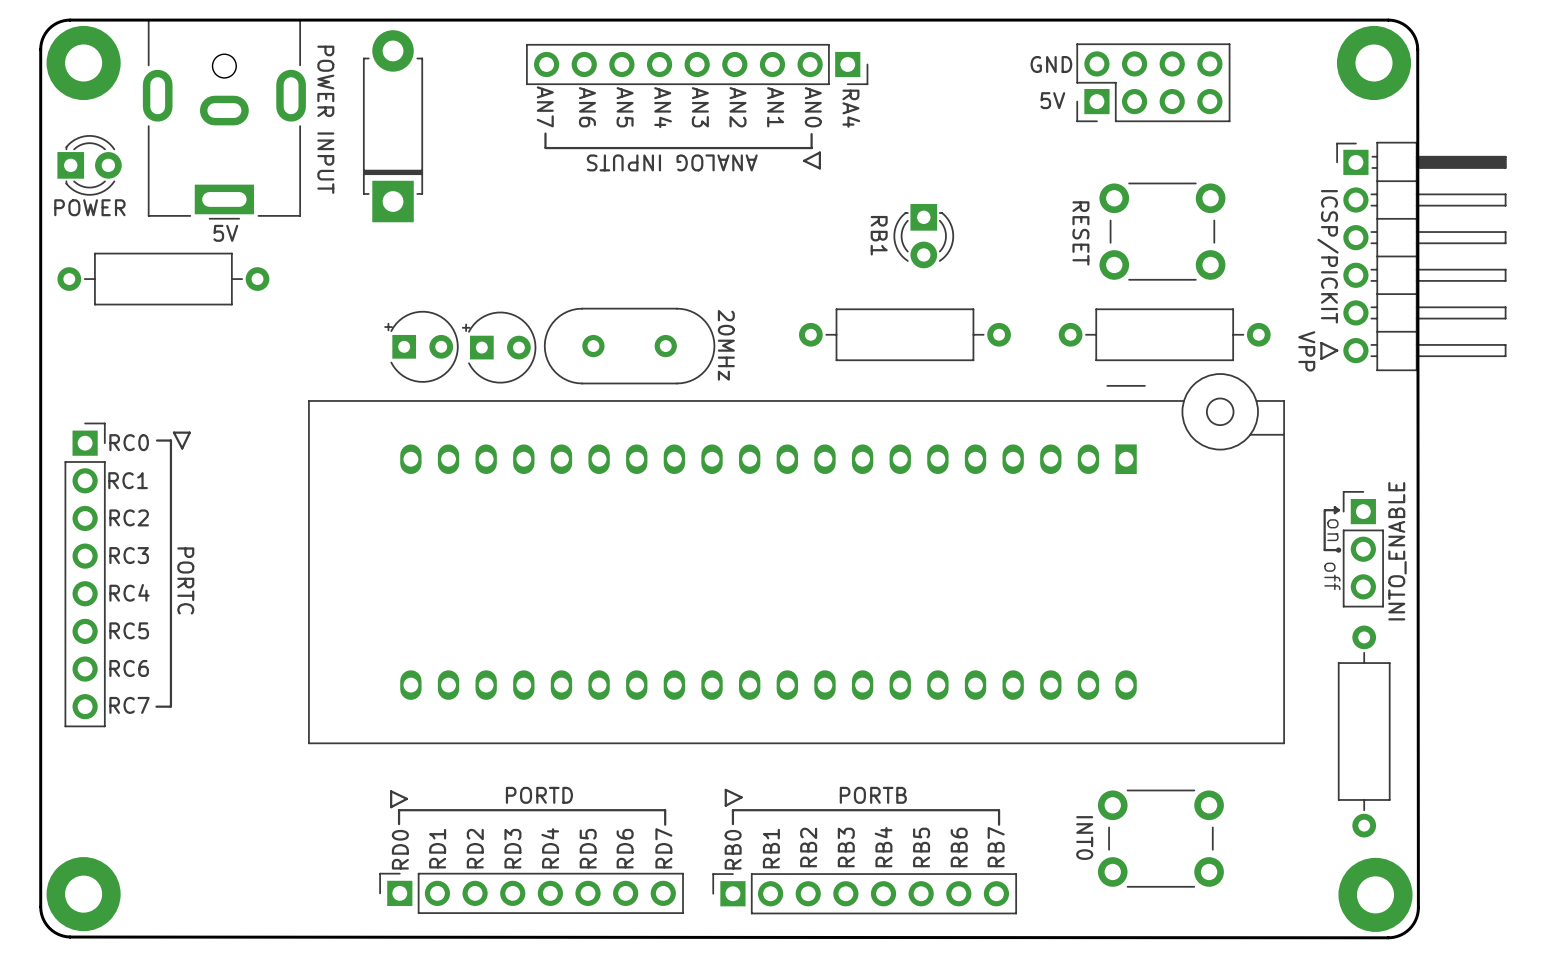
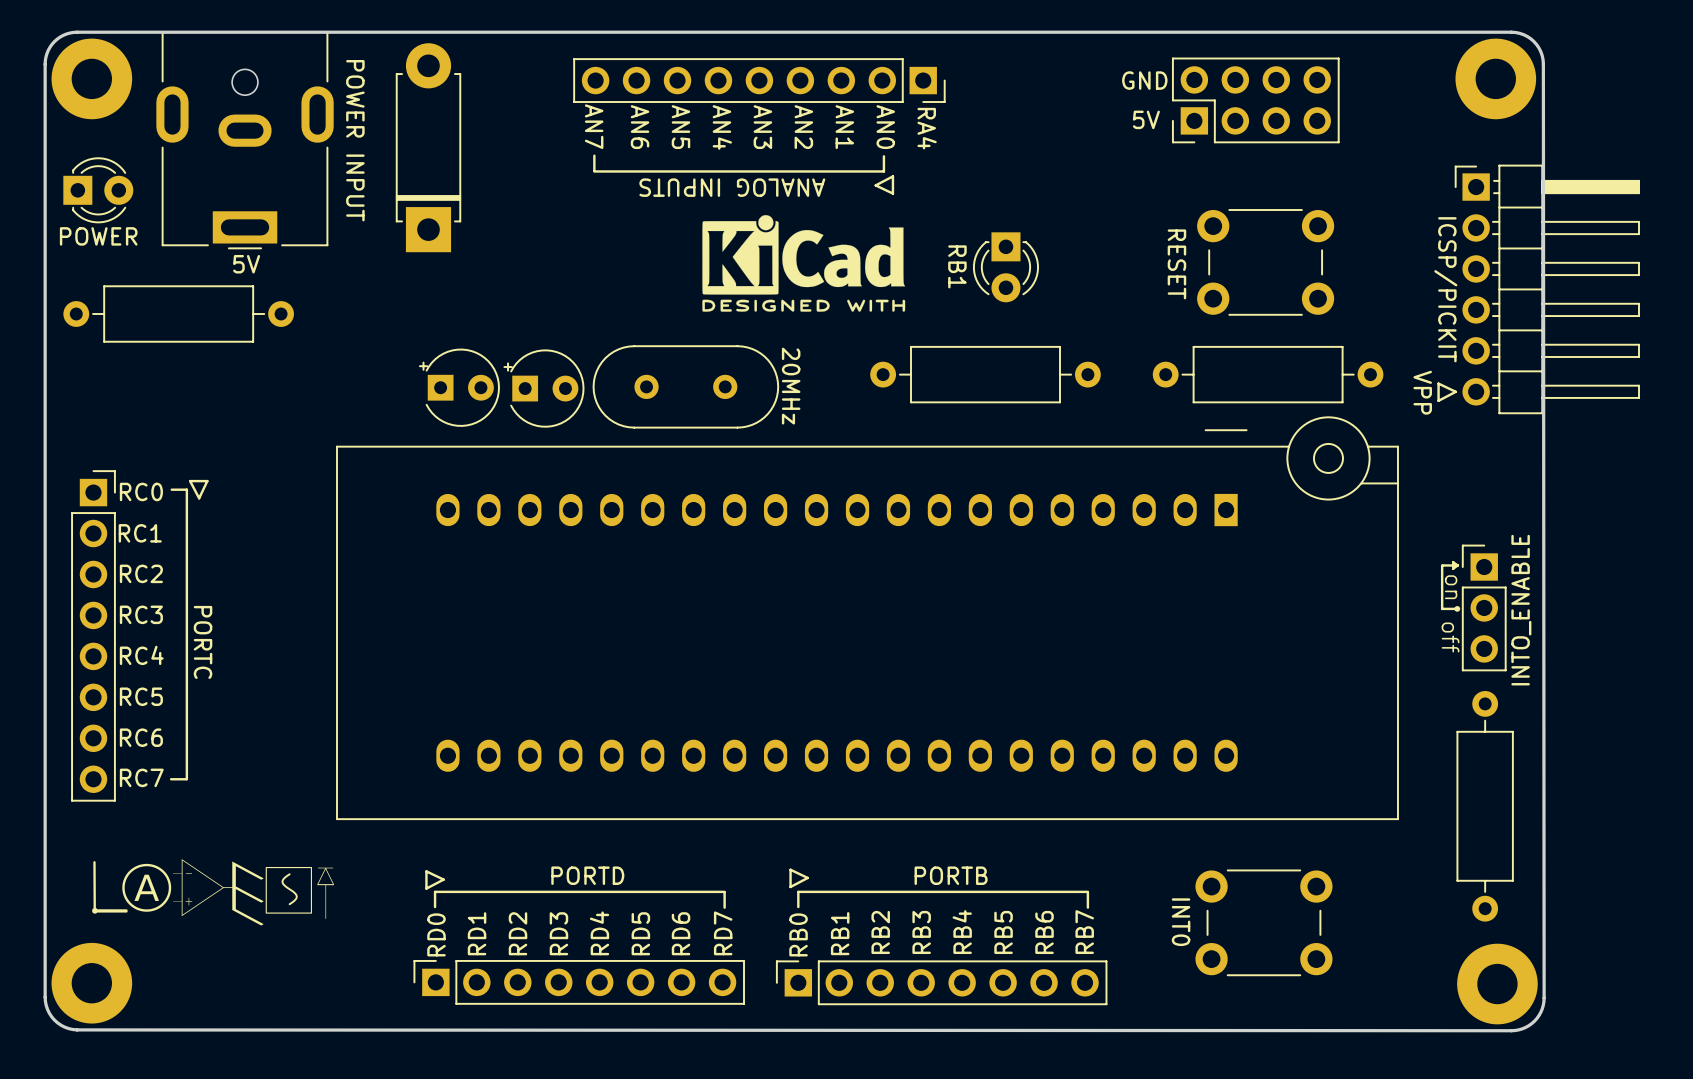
drawing: none -> [702, 215, 906, 312]
drawing: none -> [92, 859, 335, 926]

